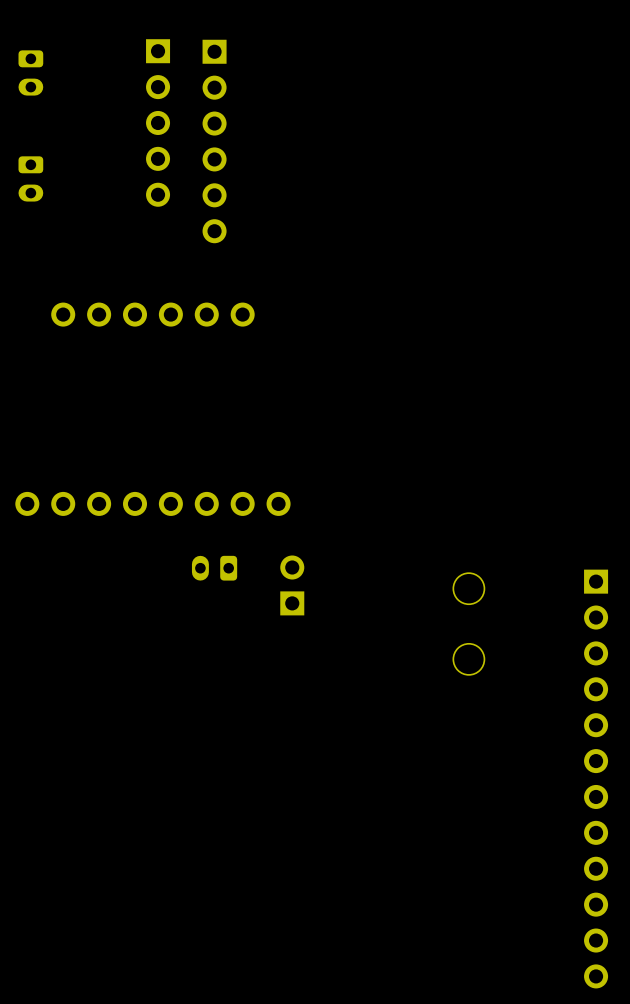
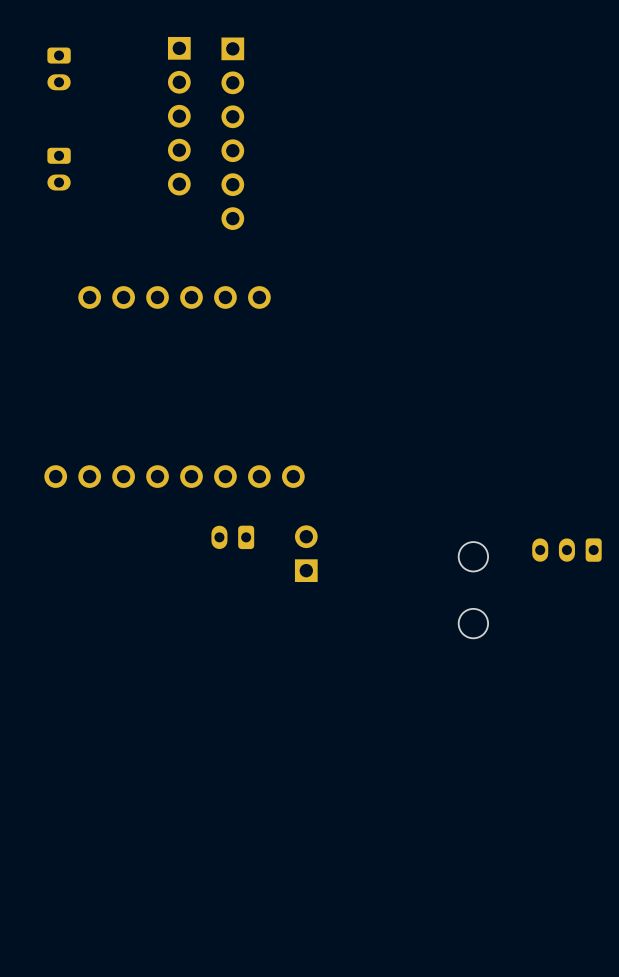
part: none -> (566, 550)
part: (596, 779) -> none

